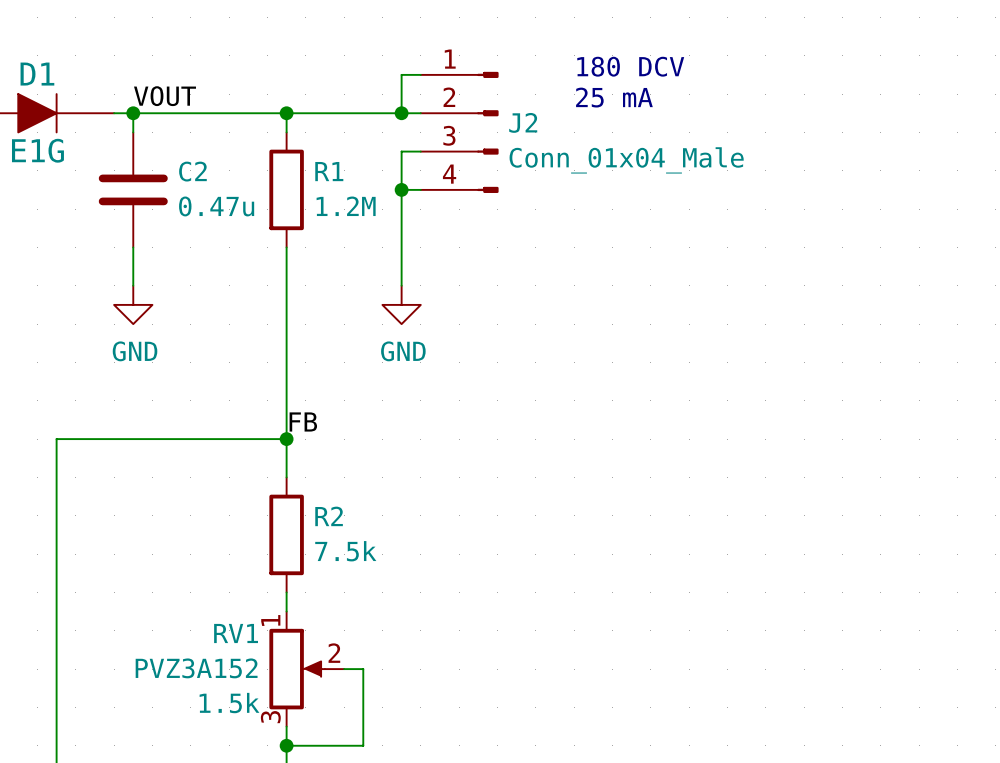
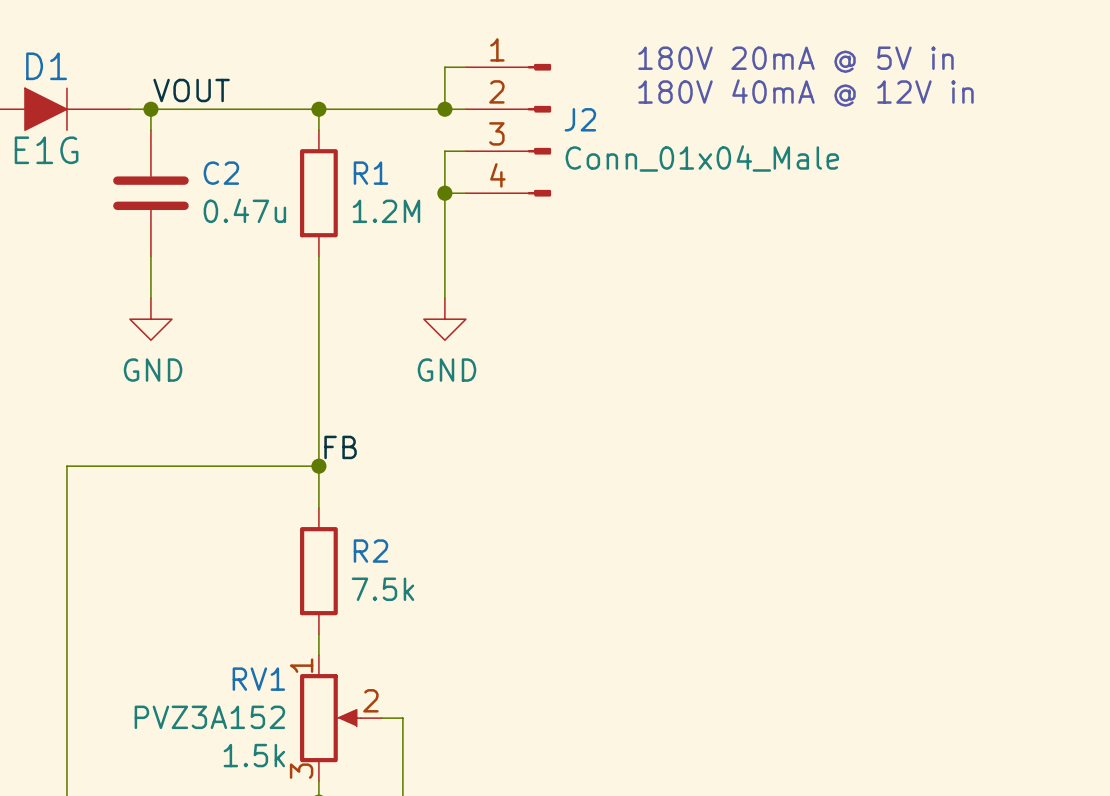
text: 180 DCV (630, 66) -> 180V 20mA @ 5V in (795, 59)
text: 25 mA (614, 97) -> 180V 40mA @ 12V in (805, 93)

